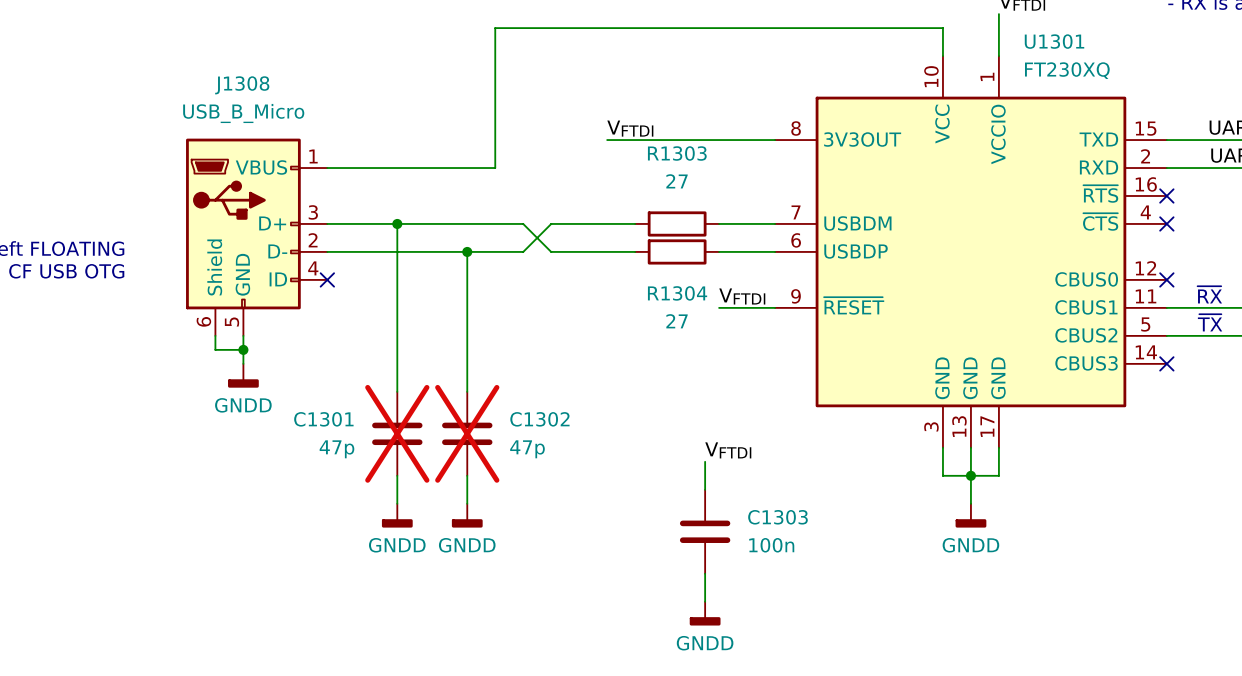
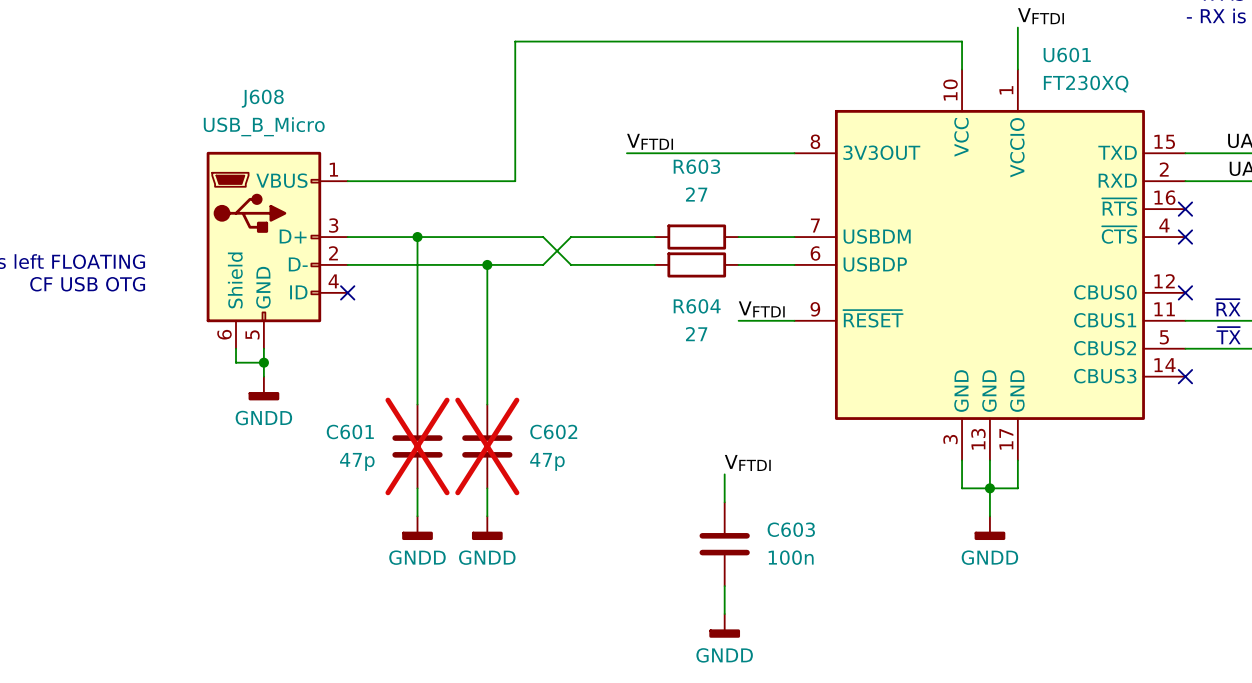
U1301 name: U1301 (1054, 41) -> U601 (1067, 55)
J1308 name: J1308 (242, 85) -> J608 (262, 98)
R1303 name: R1303 (677, 153) -> R603 (696, 166)
R1304 name: R1304 (677, 293) -> R604 (697, 306)
C1301 name: C1301 (323, 419) -> C601 (350, 431)
C1302 name: C1302 (539, 419) -> C602 (553, 431)
C1303 name: C1303 (777, 517) -> C603 (791, 529)

